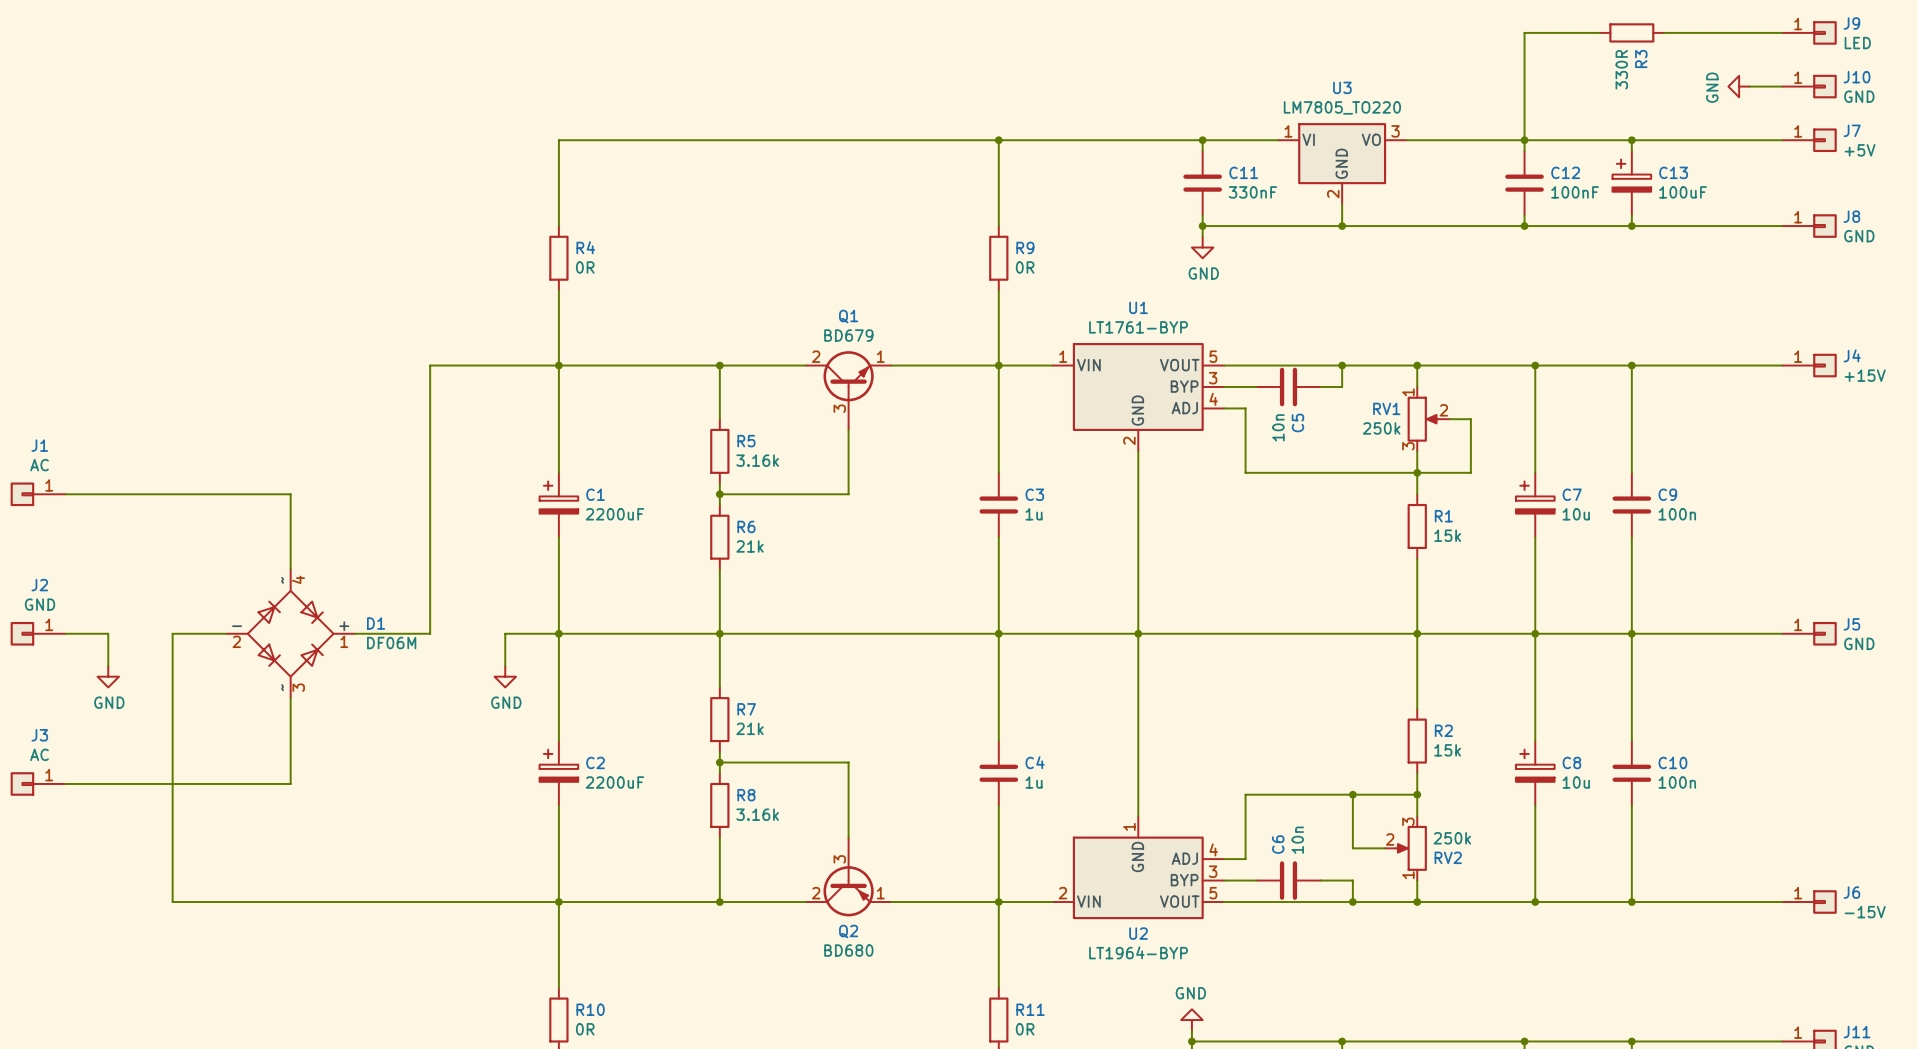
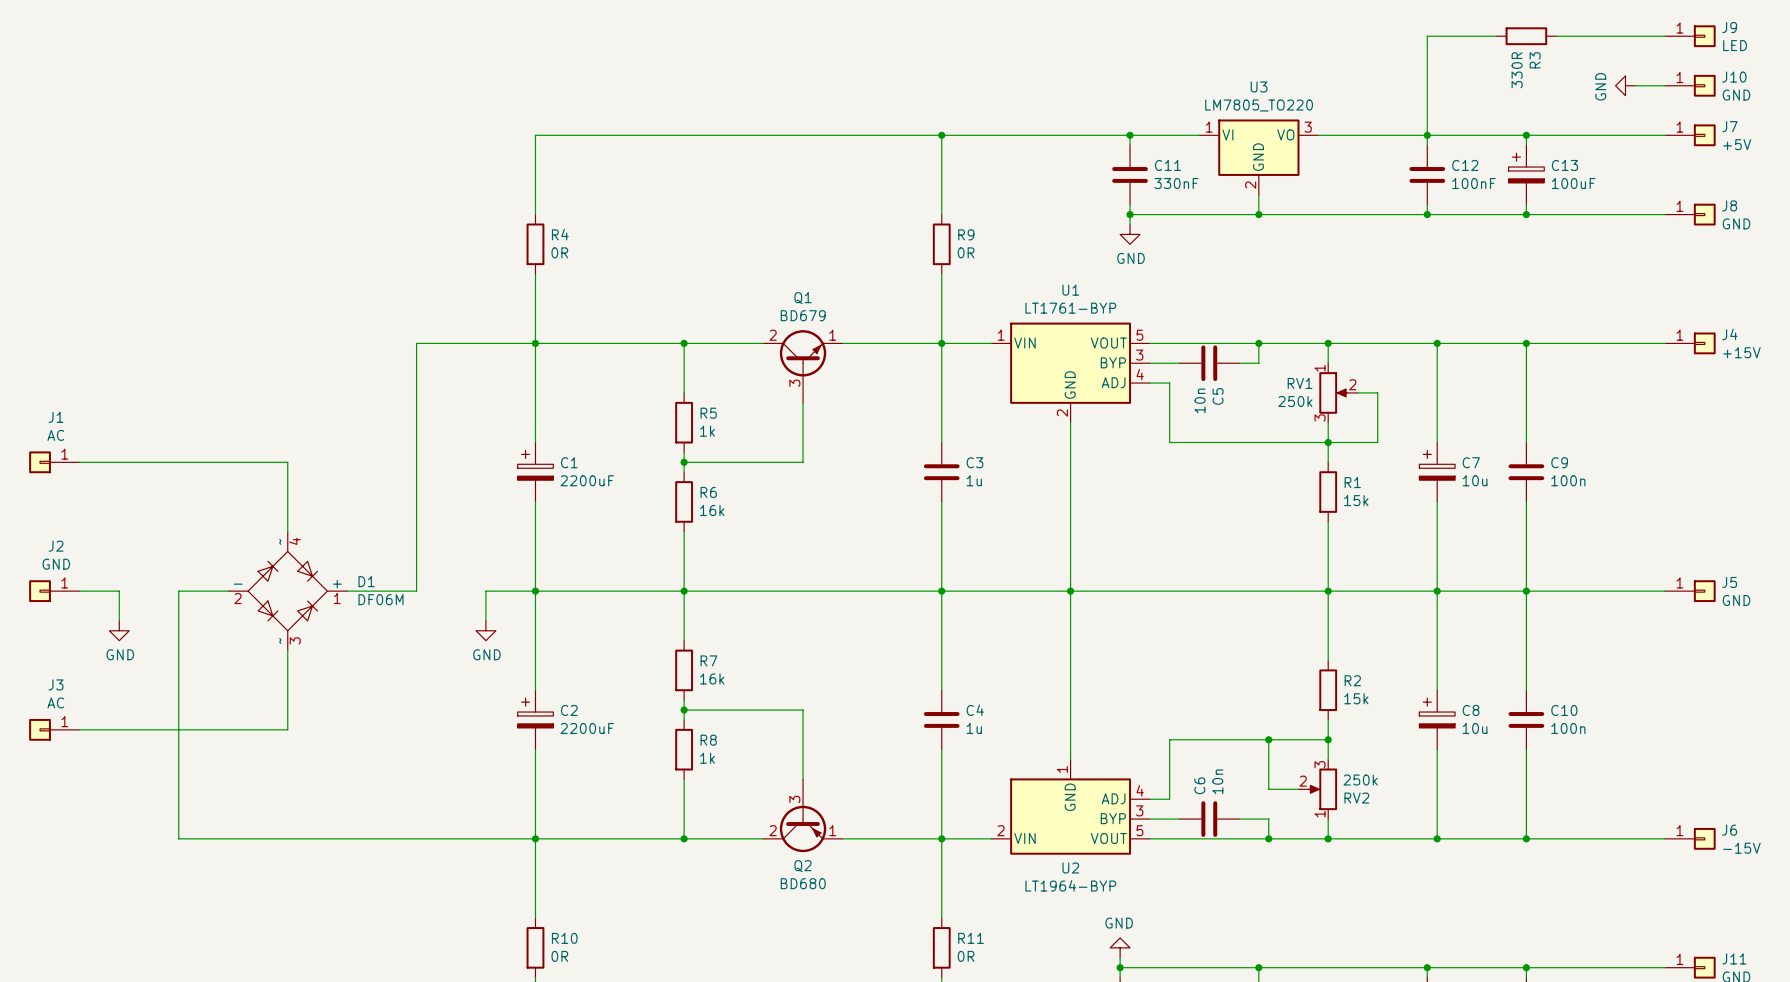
R5 value: 3.16k (757, 460) -> 1k (707, 431)
R6 value: 21k (750, 546) -> 16k (712, 510)
R7 value: 21k (750, 728) -> 16k (712, 678)
R8 value: 3.16k (757, 814) -> 1k (707, 758)

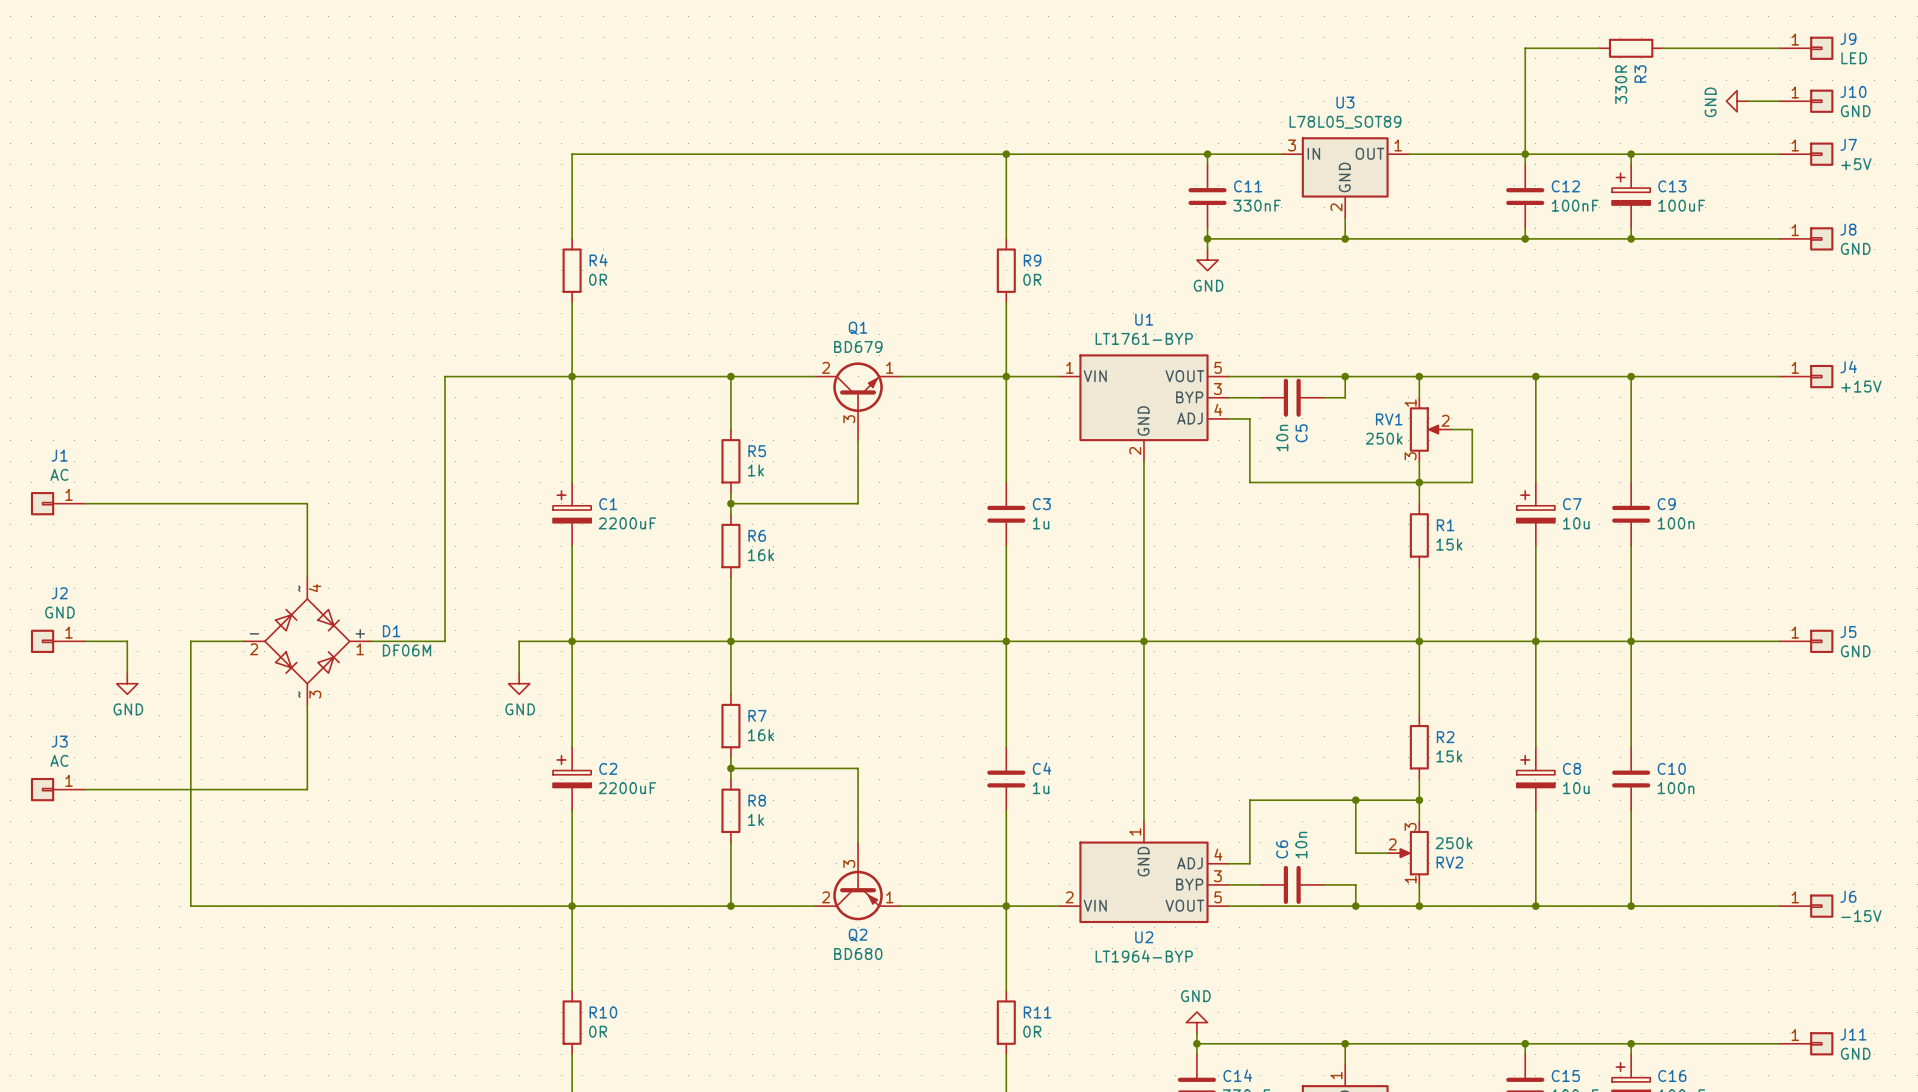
U3 value: LM7805_TO220 (1259, 105) -> L78L05_SOT89 (1345, 122)
U3 pin number: 1 (1209, 127) -> 3 (1291, 145)
U3 pin number: 3 (1308, 127) -> 1 (1398, 145)
U3 pin name: VI (1227, 134) -> IN (1313, 153)
U3 pin name: VO (1285, 134) -> OUT (1369, 153)

